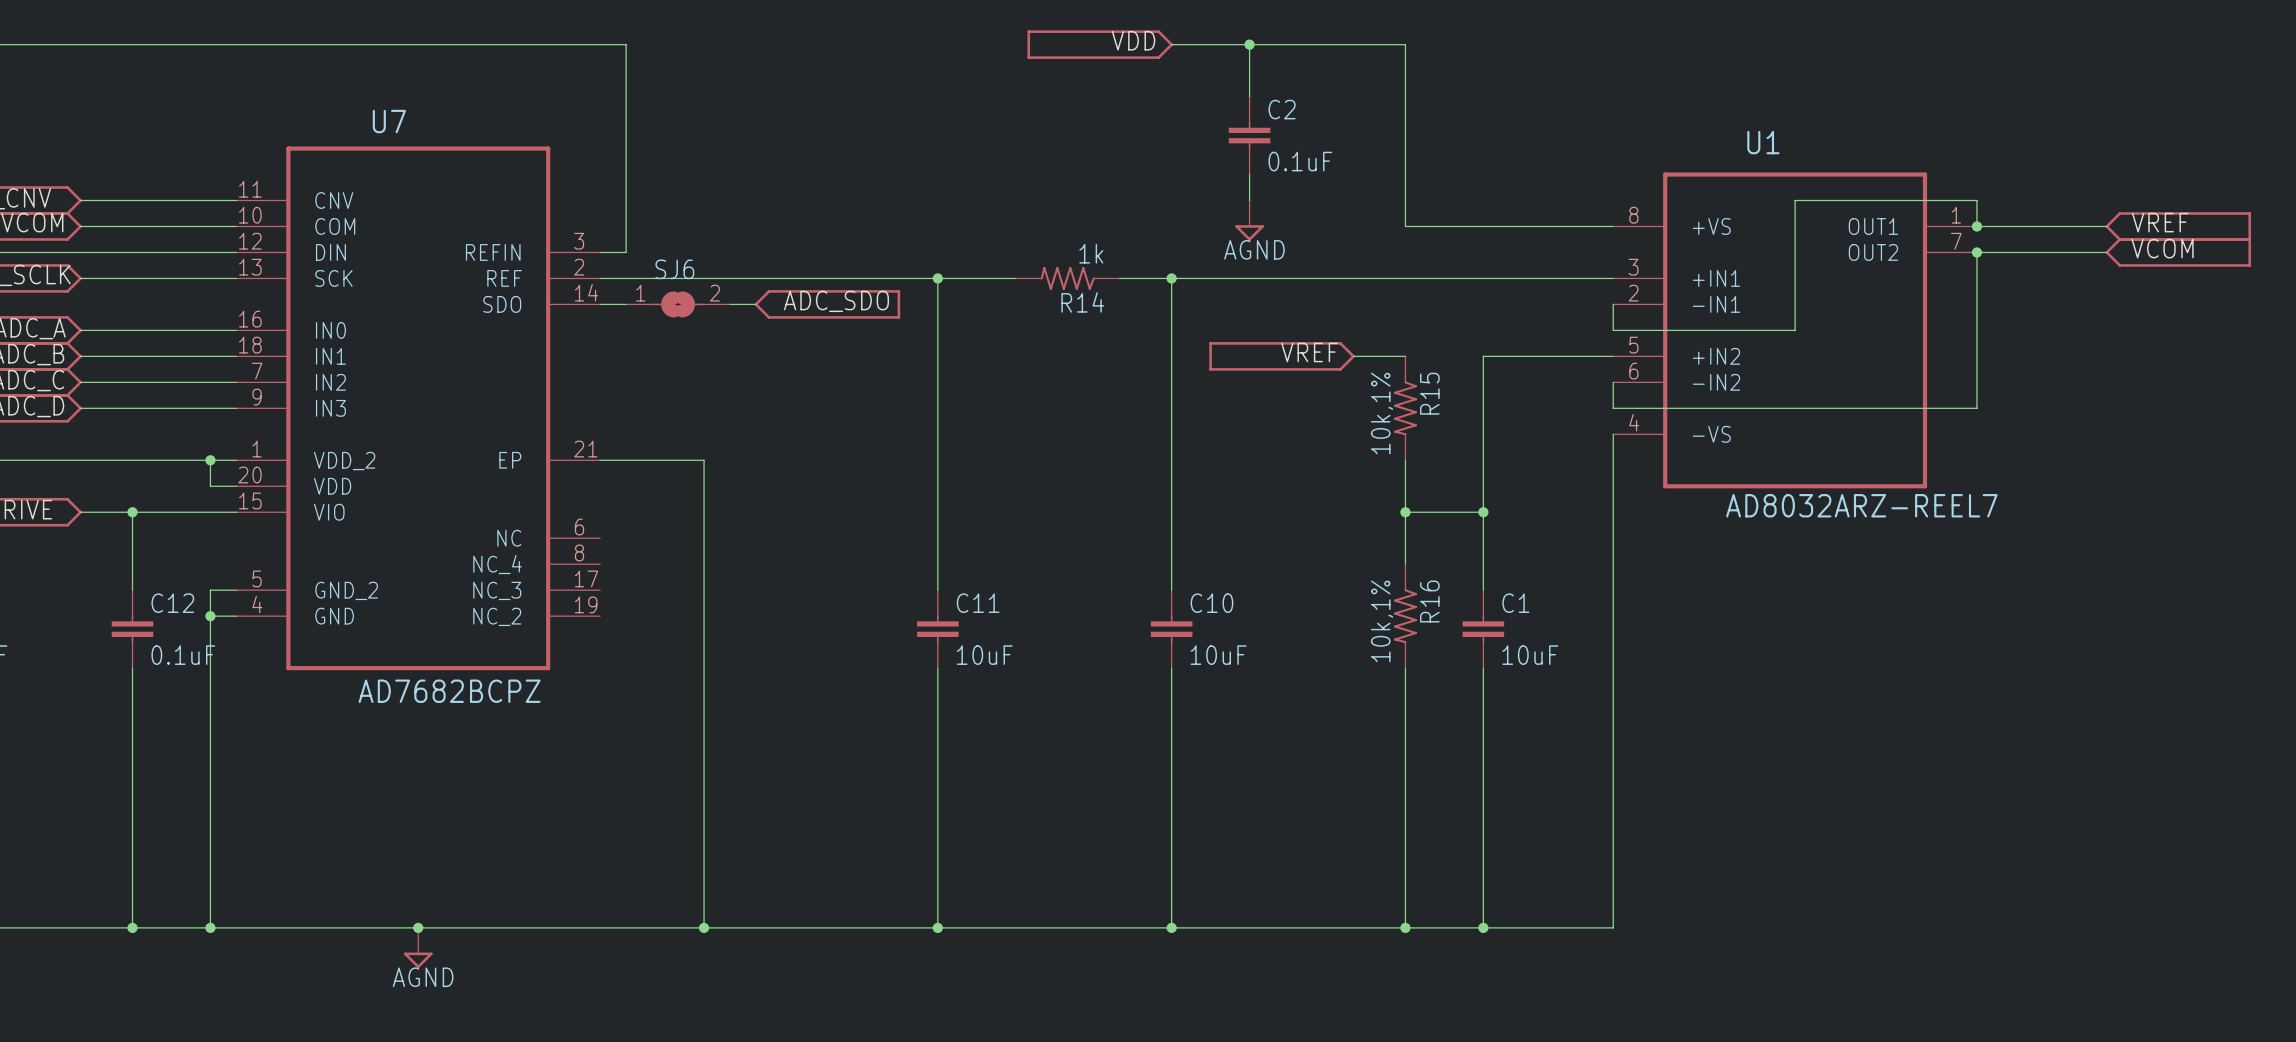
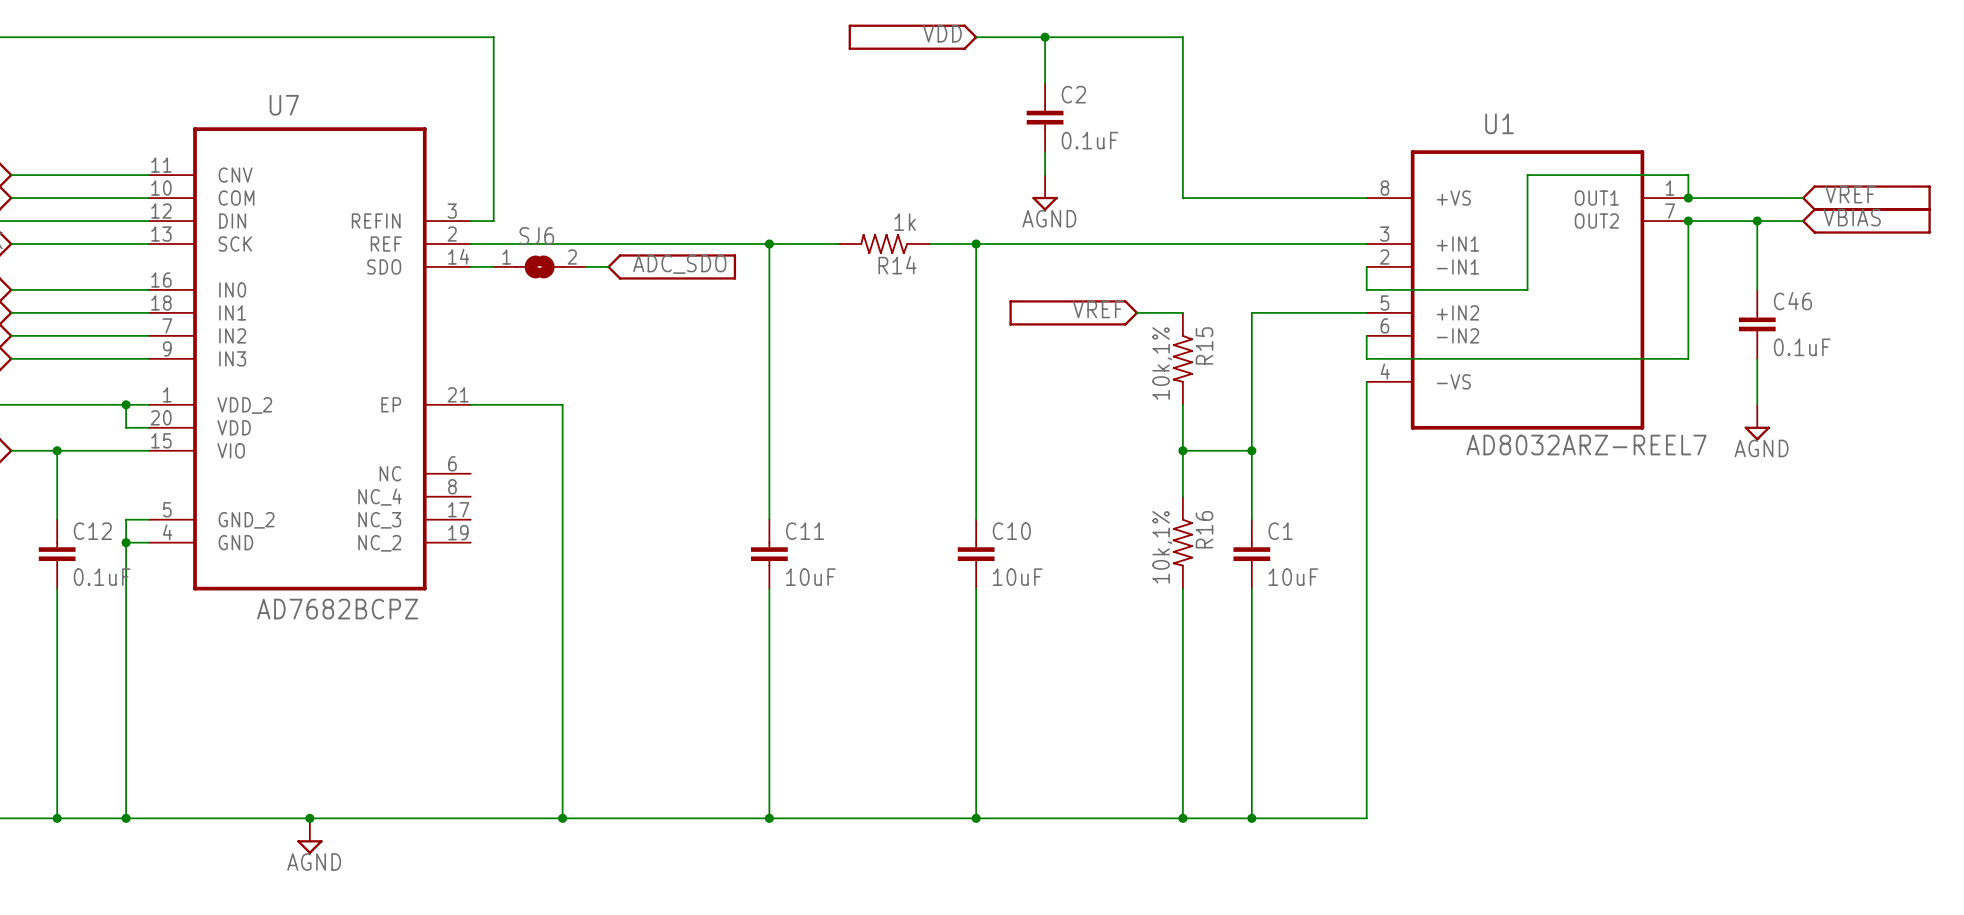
label: VCOM (2162, 248) -> VBIAS (1852, 217)
wire: none -> (1757, 221) (1757, 289)
junction: none -> (1757, 221)
C46: none -> 0.1uF (1757, 324)
wire: none -> (1757, 358) (1757, 404)
power symbol: none -> AGND (1757, 422)

